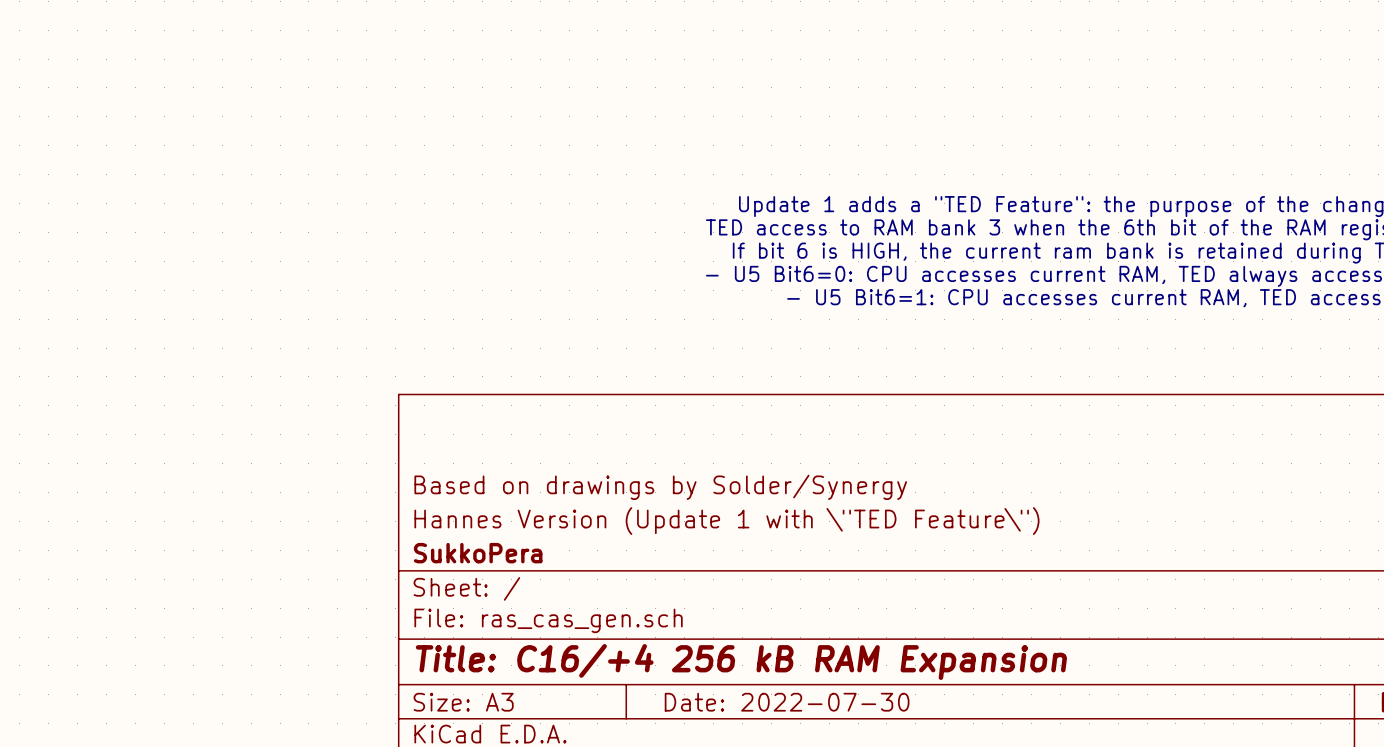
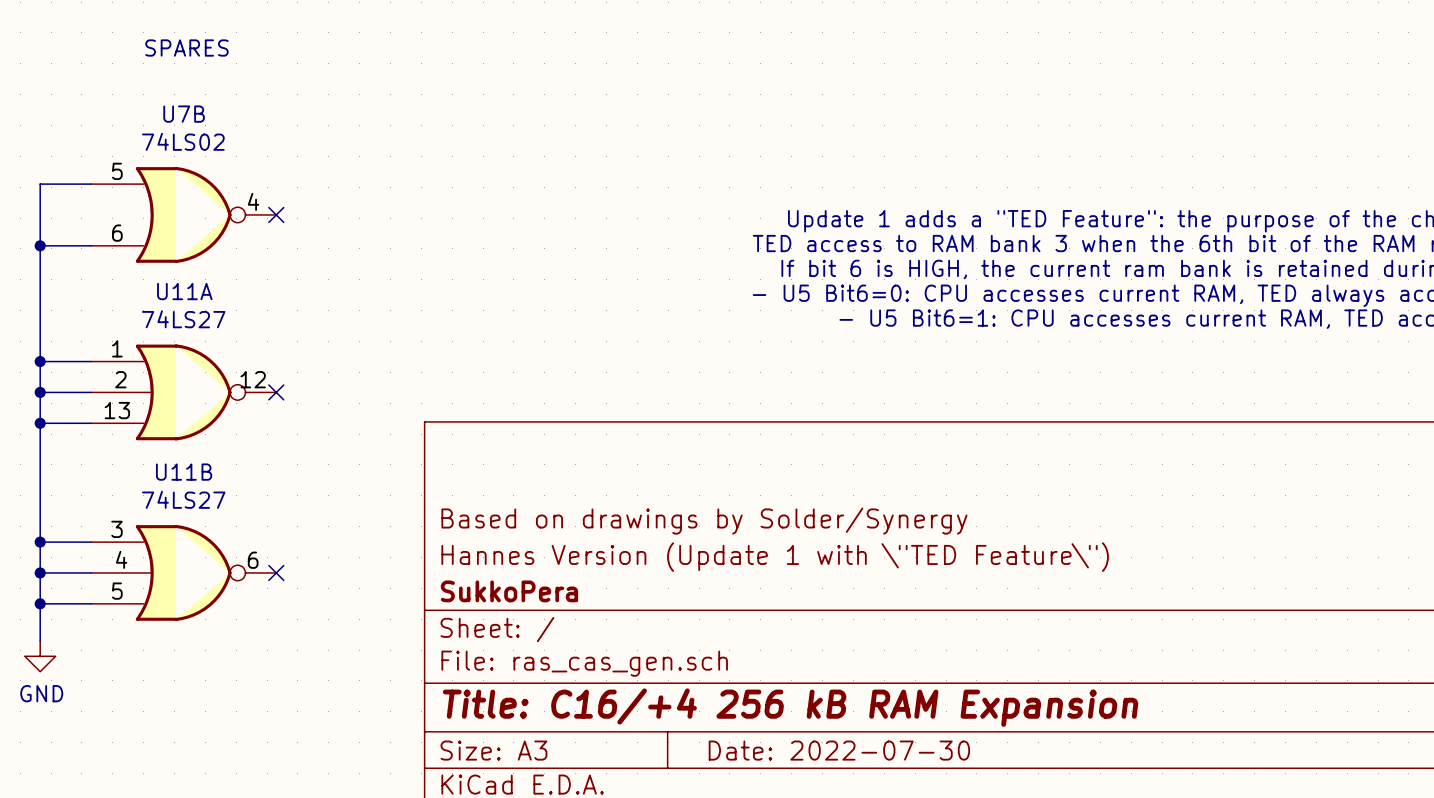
text: none -> SPARES (186, 48)
wire: none -> (91, 184) (40, 184) (40, 640)
U7B: none -> 74LS02 (183, 214)
no-connect mark: none -> (276, 214)
wire: none -> (40, 245) (91, 245)
junction: none -> (40, 245)
wire: none -> (40, 361) (91, 361)
junction: none -> (40, 361)
wire: none -> (40, 392) (91, 392)
junction: none -> (40, 392)
U11A: none -> 74LS27 (183, 392)
no-connect mark: none -> (276, 392)
wire: none -> (40, 423) (91, 423)
junction: none -> (40, 423)
wire: none -> (40, 542) (91, 542)
junction: none -> (40, 542)
wire: none -> (40, 572) (91, 572)
junction: none -> (40, 572)
U11B: none -> 74LS27 (183, 572)
no-connect mark: none -> (276, 572)
wire: none -> (40, 603) (91, 603)
junction: none -> (40, 603)
power symbol: none -> GND (40, 656)

